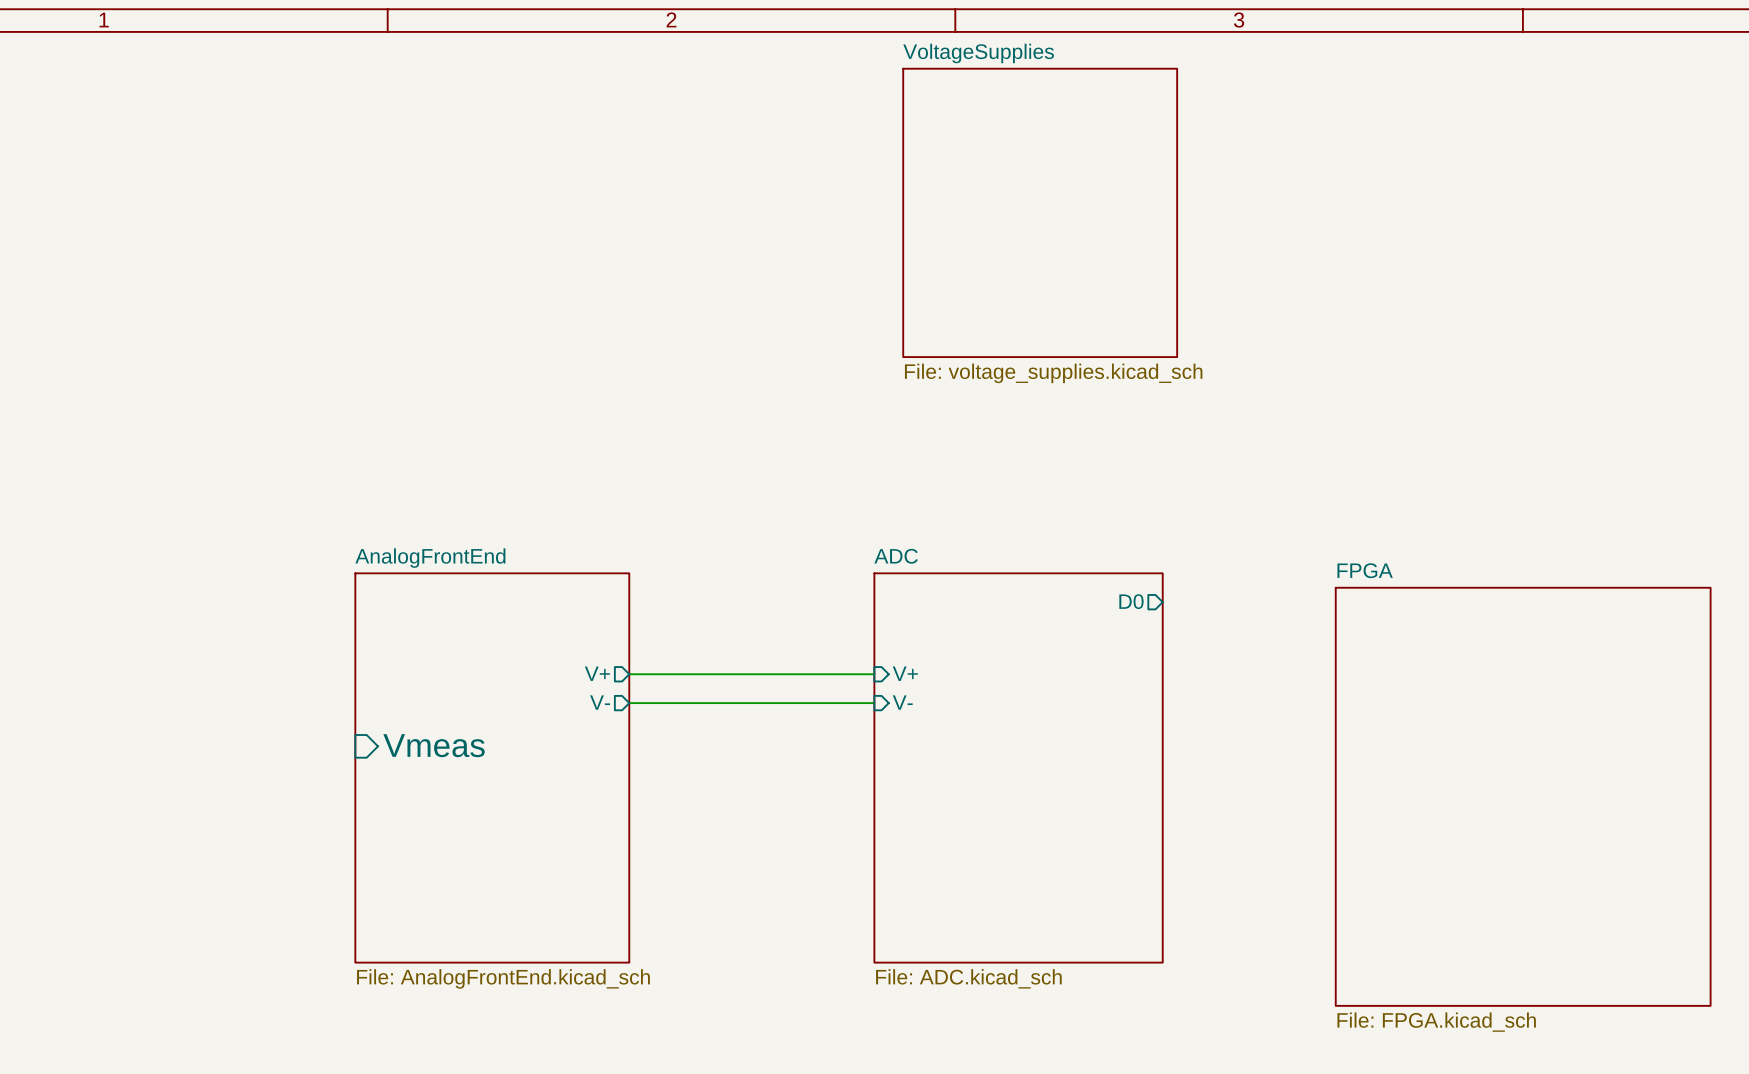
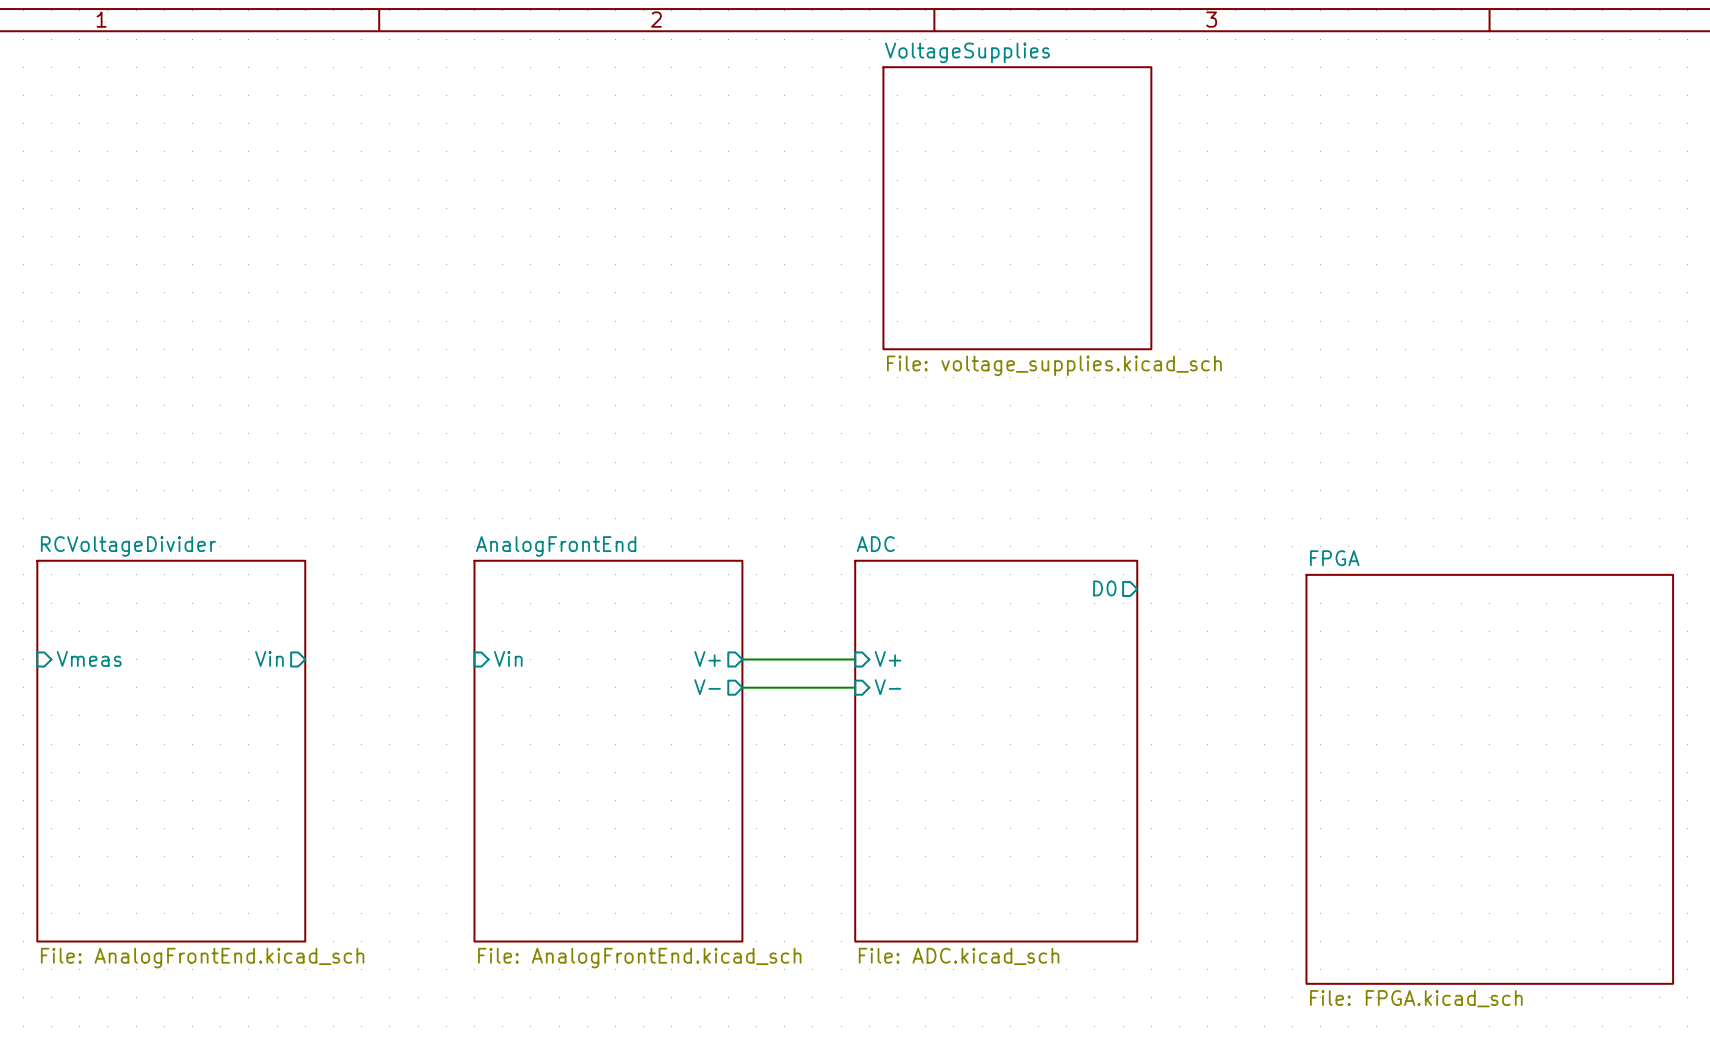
sheet pin: none -> Vmeas (89, 658)
sheet pin: none -> Vin (269, 658)
sheet pin: none -> Vin (508, 658)
sheet pin position: V+ (597, 673) -> V+ (707, 658)
wire: (629, 674) (759, 674) -> none
sheet pin position: V- (600, 702) -> V- (707, 687)
wire: (629, 703) (759, 703) -> none
sheet pin: Vmeas (434, 745) -> none
sheet RCVoltageDivider: none -> File: AnalogFrontEnd.kicad_sch (171, 751)
sheet AnalogFrontEnd position: (492, 767) -> (608, 751)

